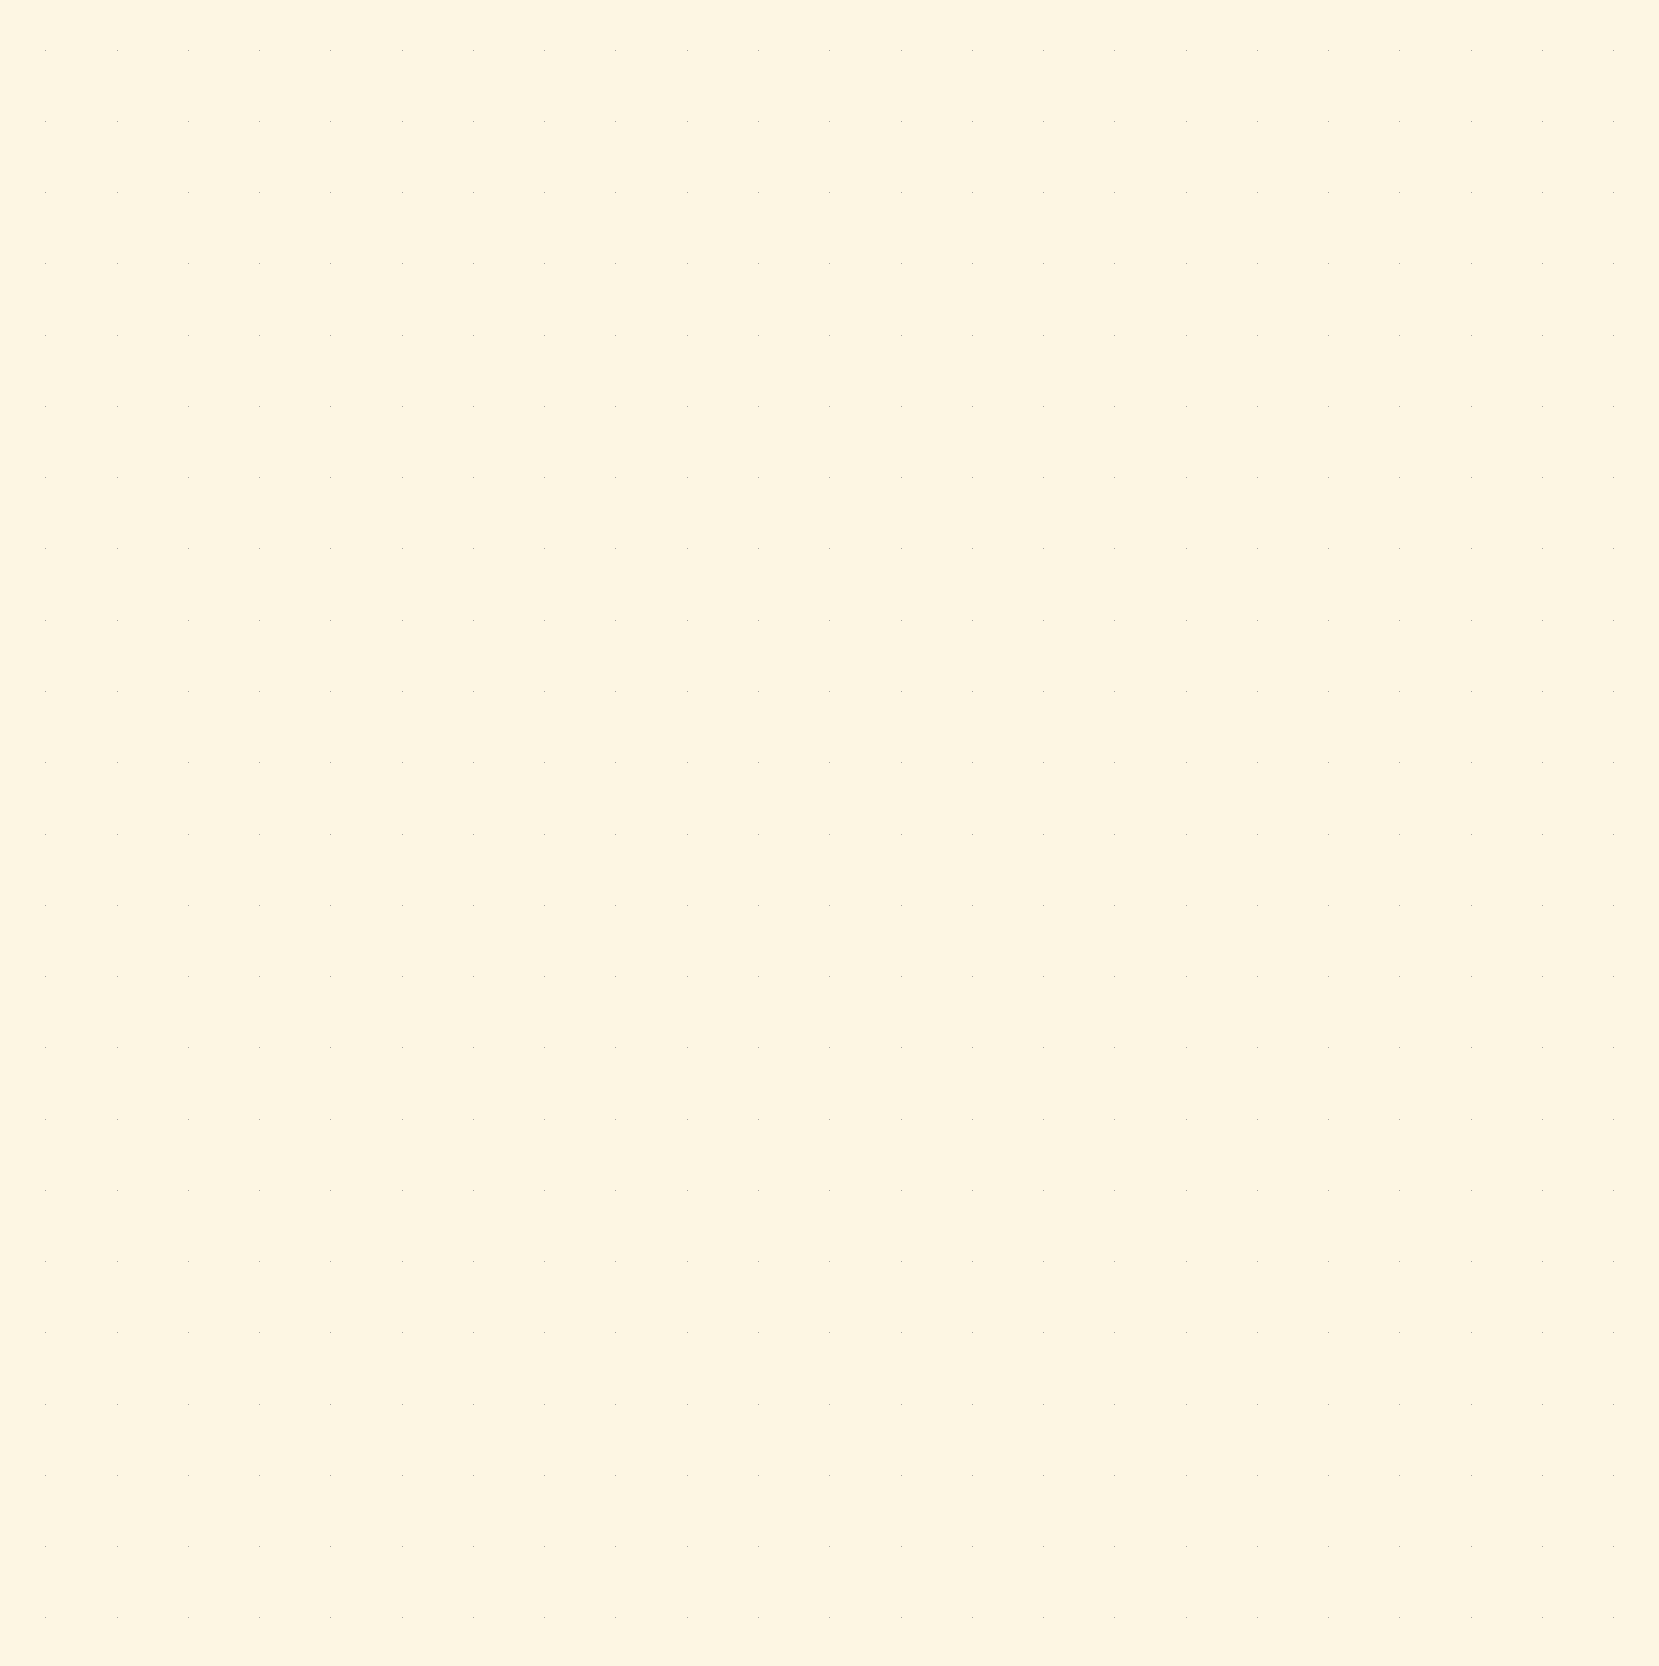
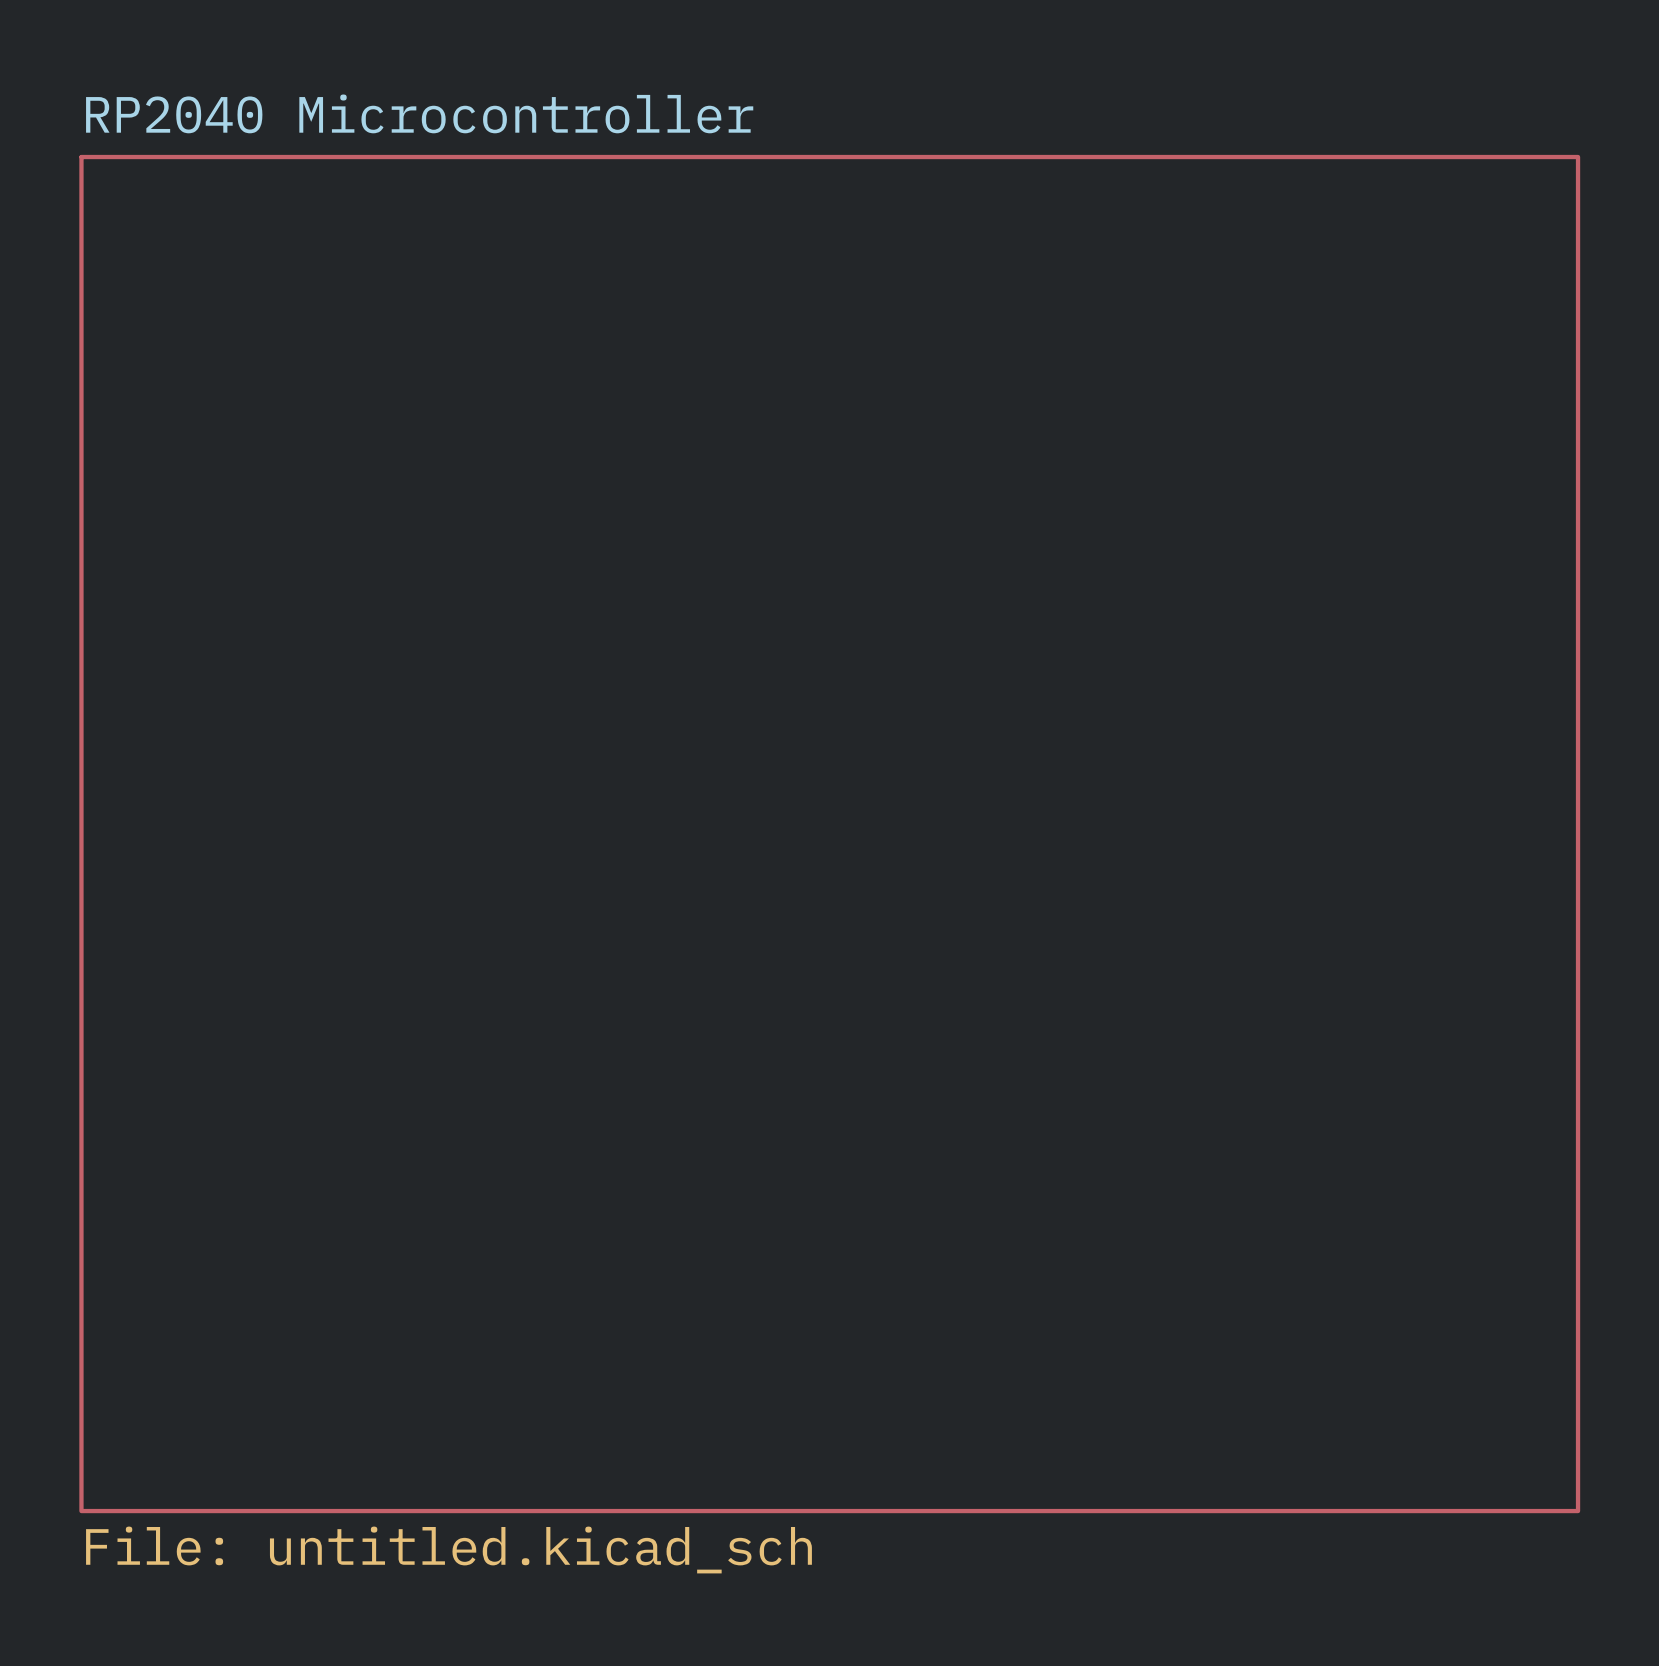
sheet RP2040 Microcontroller: none -> File: untitled.kicad_sch (829, 834)

